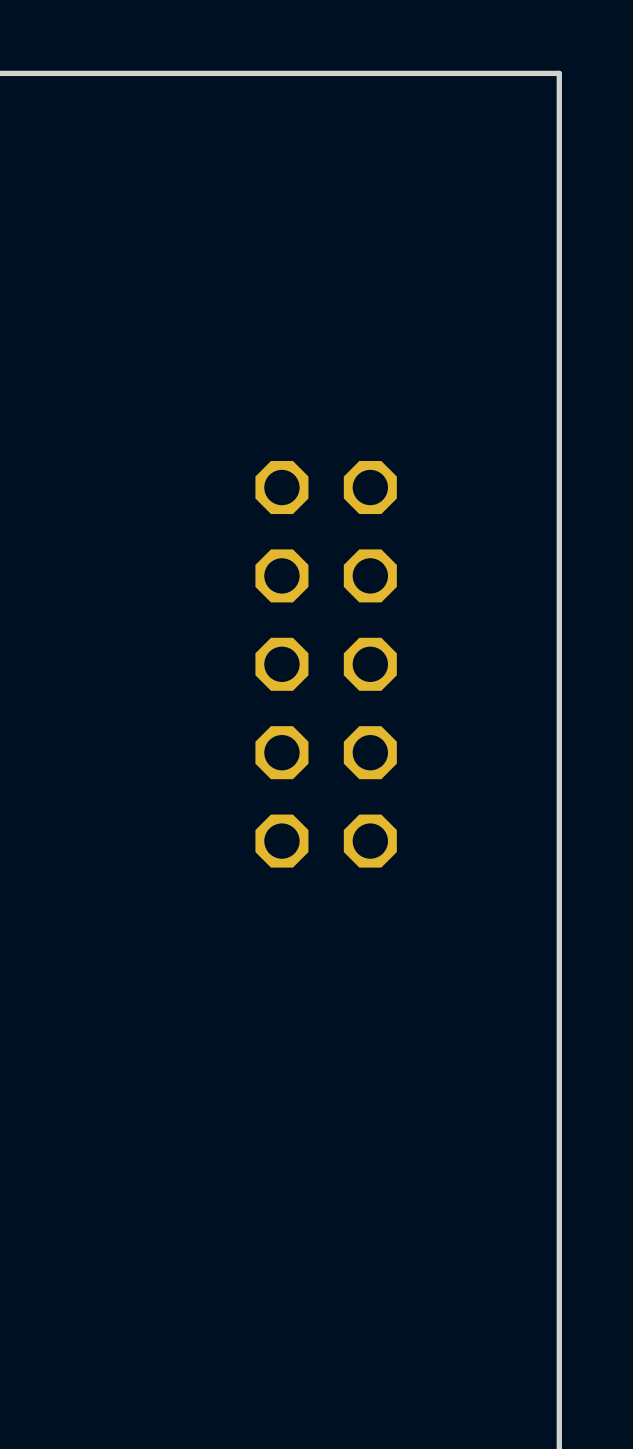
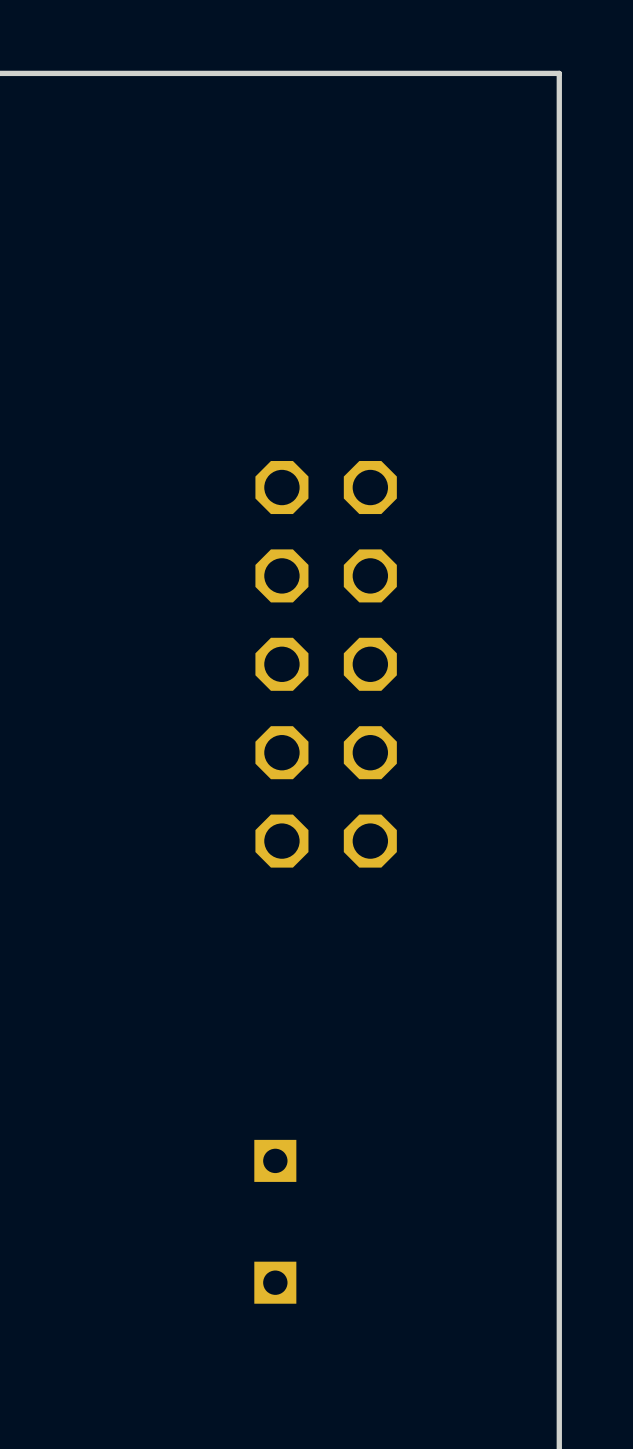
part: none -> (275, 1221)

